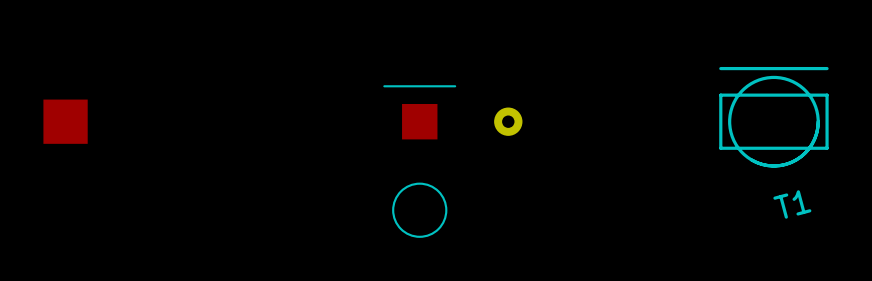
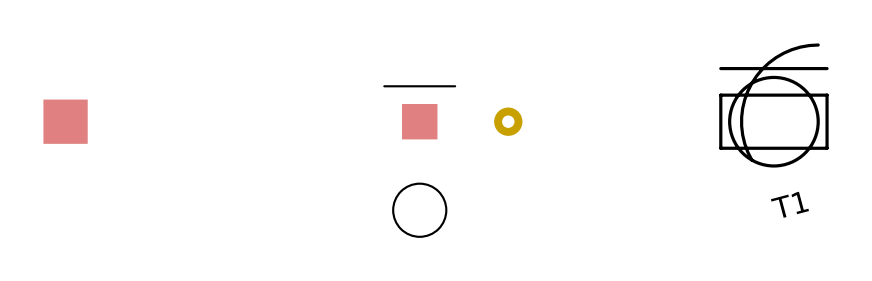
drawing shape: [719, 66, 829, 219] -> [719, 43, 829, 218]

